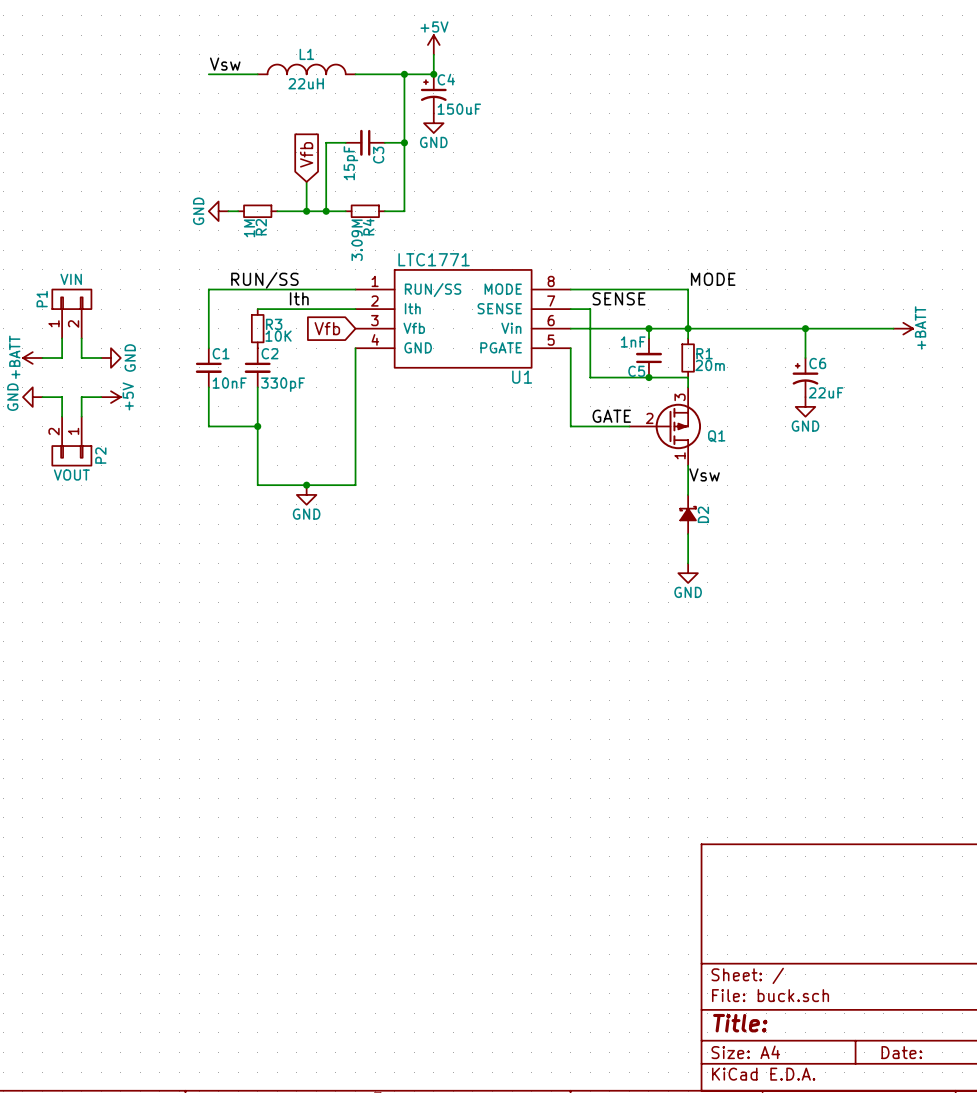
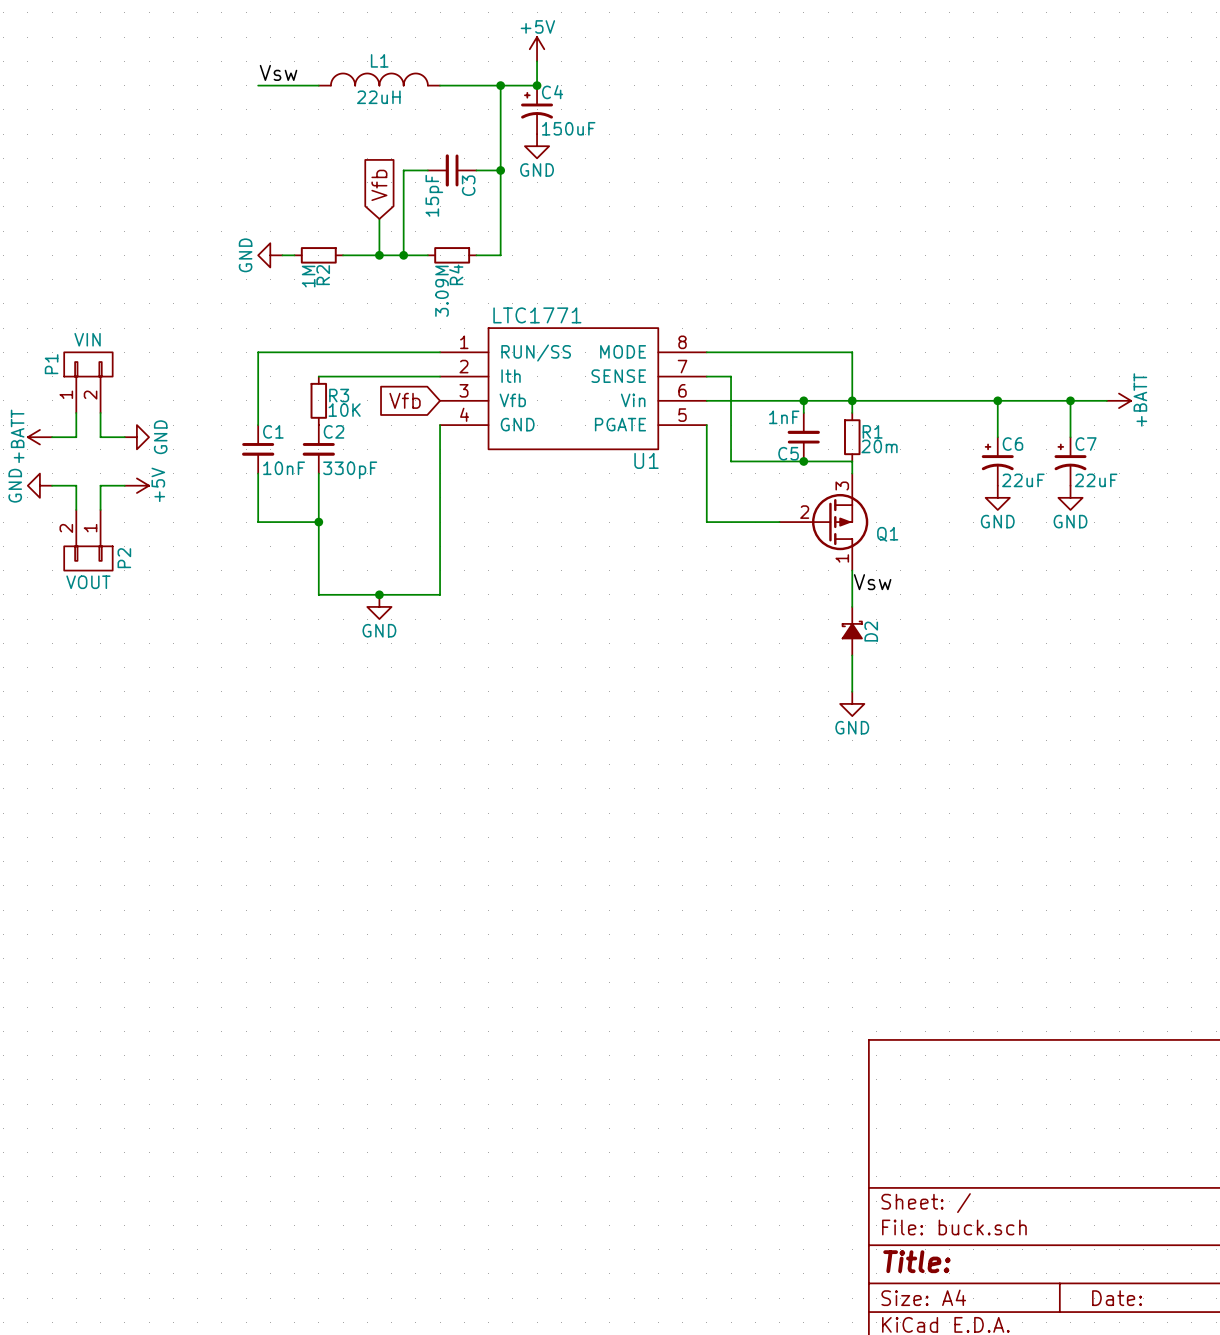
label: MODE (713, 279) -> none
label: RUN/SS (264, 280) -> none
label: Ith (299, 298) -> none
label: SENSE (619, 298) -> none
wire: none -> (1070, 400) (1070, 437)
junction: none -> (1070, 400)
C7: none -> 22uF (1070, 461)
power symbol: none -> GND (1070, 497)
label: GATE (611, 416) -> none

